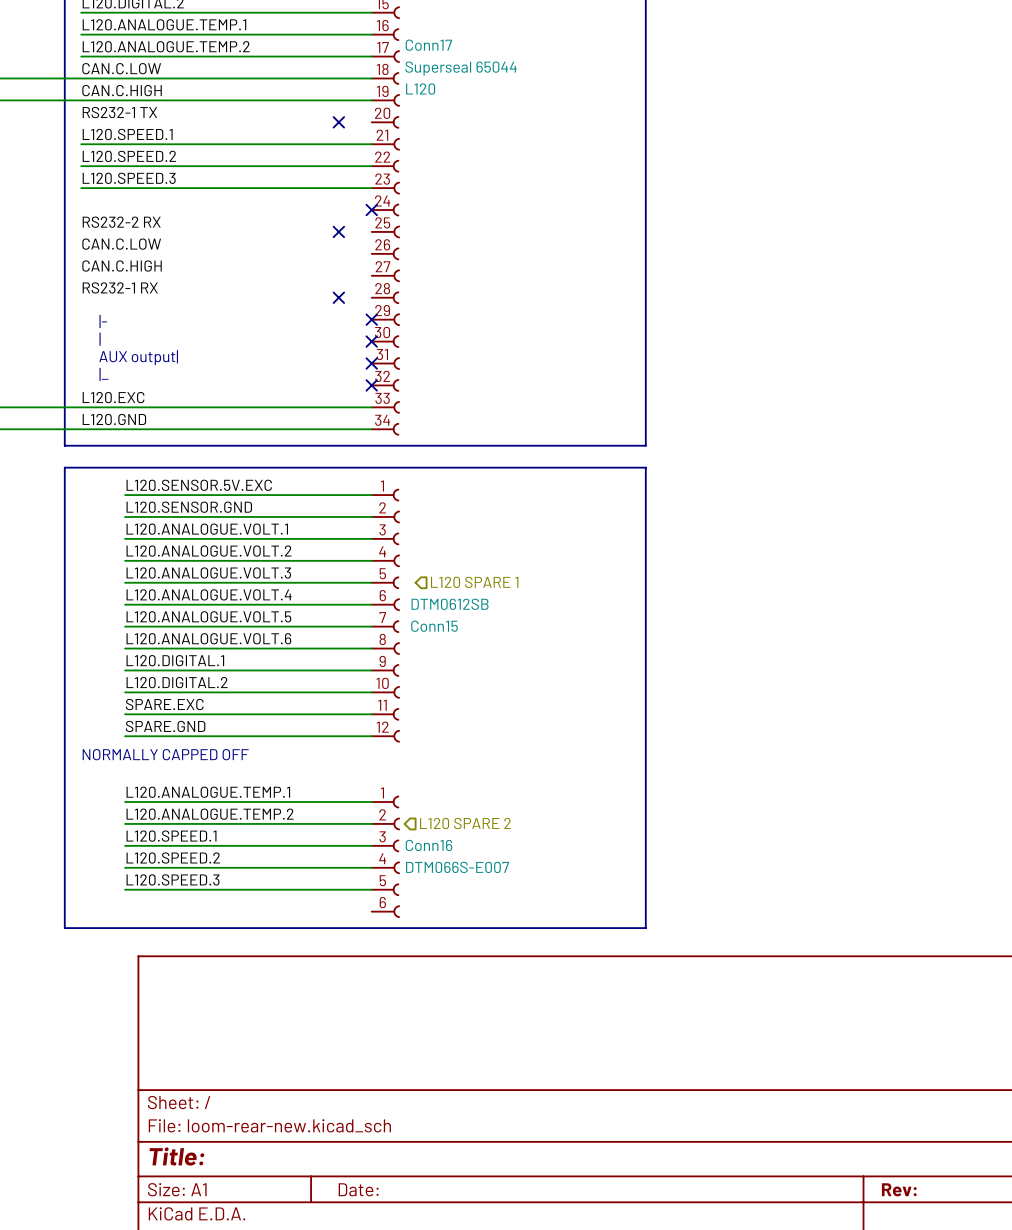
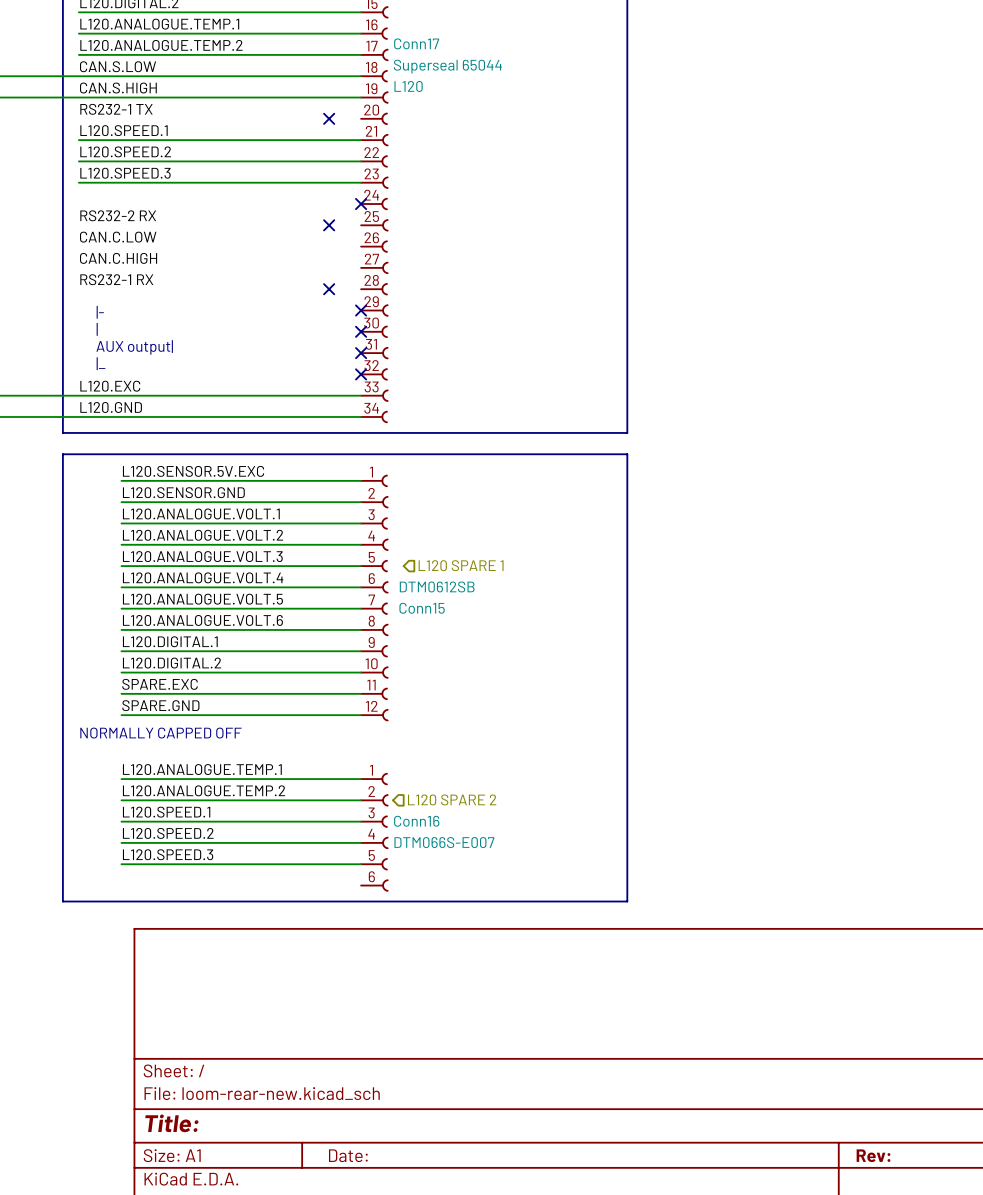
label: CAN.C.LOW (121, 68) -> CAN.S.LOW (118, 66)
label: CAN.C.HIGH (122, 90) -> CAN.S.HIGH (118, 88)

